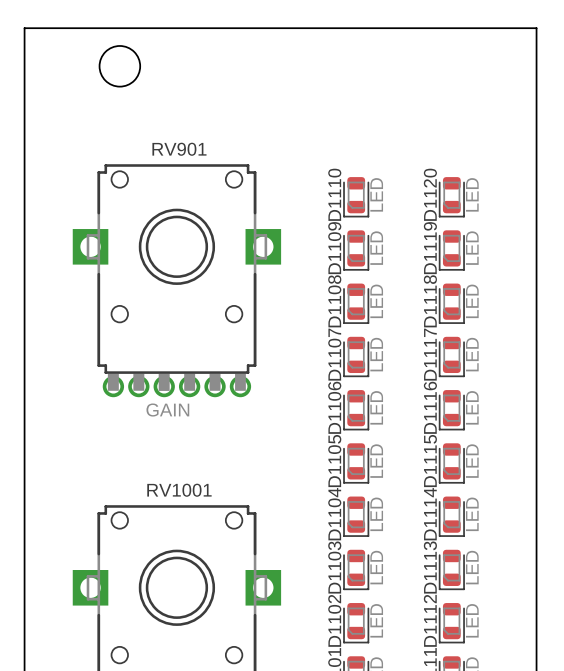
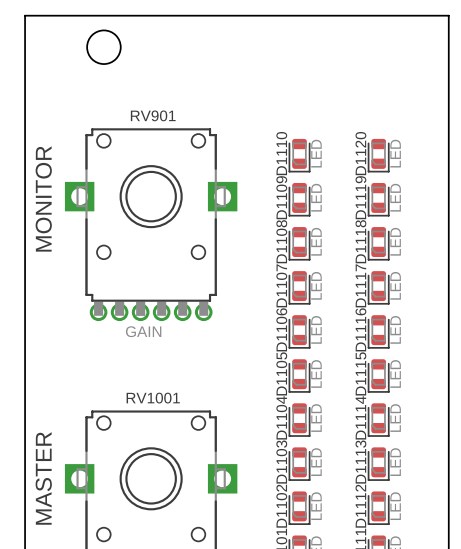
text: none -> MONITOR (43, 198)
text: none -> MASTER (43, 478)

